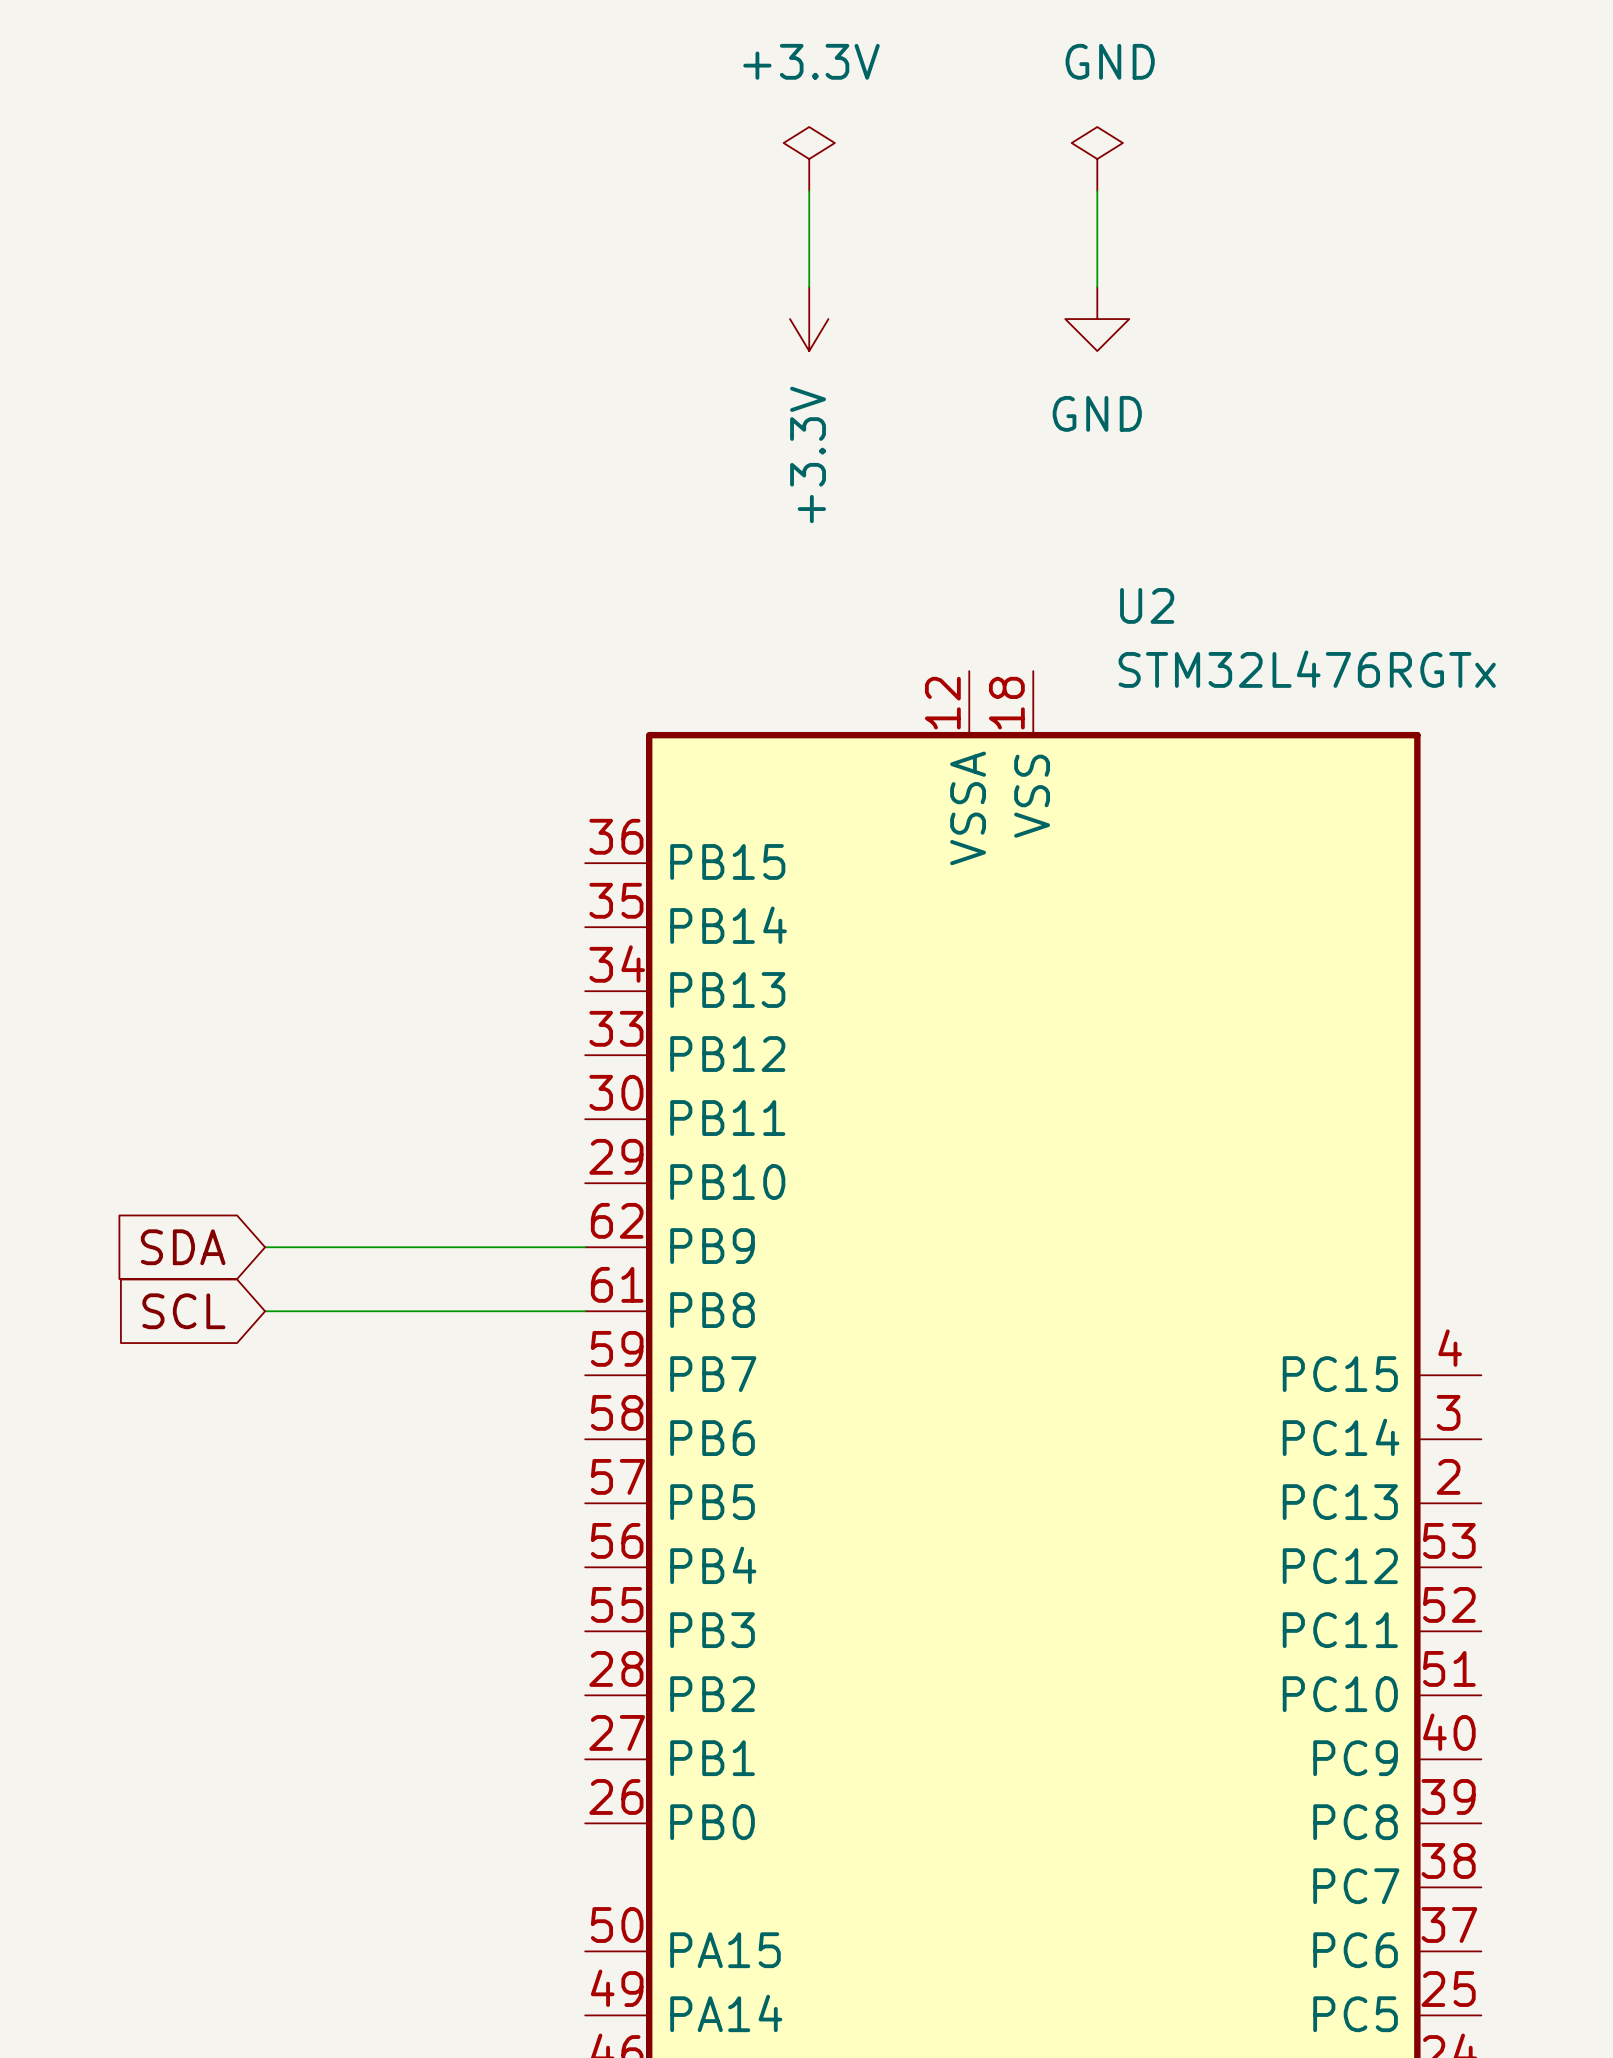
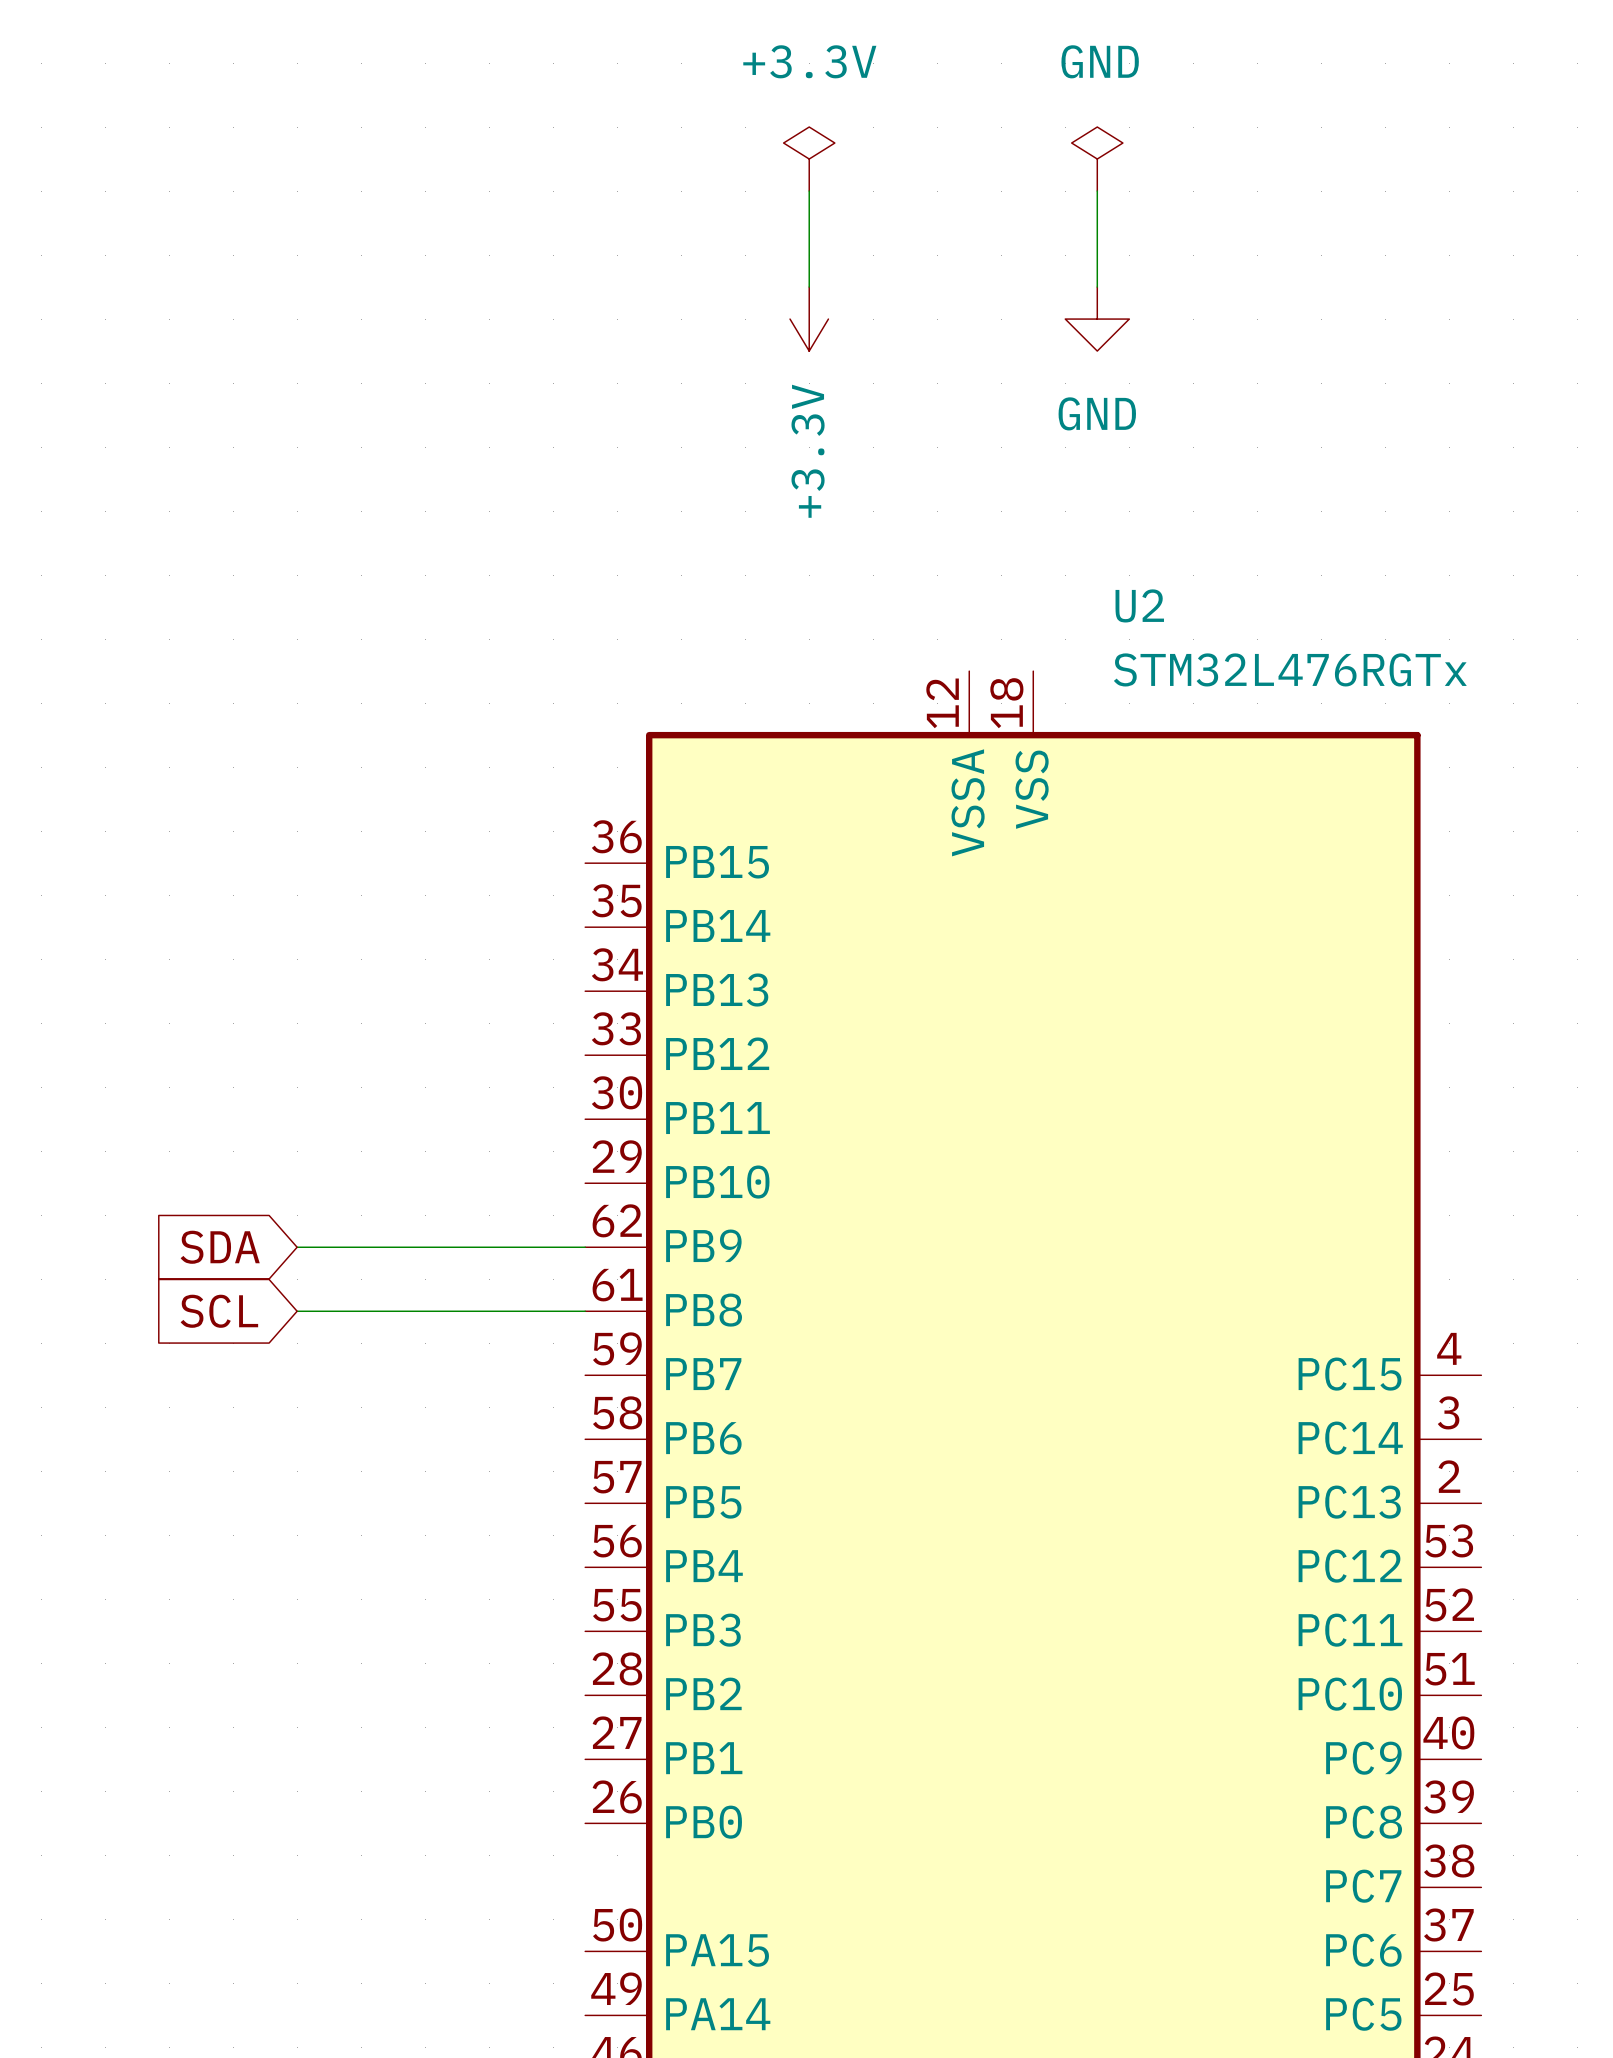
global label position: SDA (183, 1247) -> SDA (220, 1247)
wire: (265, 1247) (297, 1247) -> none
global label position: SCL (183, 1311) -> SCL (219, 1311)
wire: (265, 1311) (297, 1311) -> none

